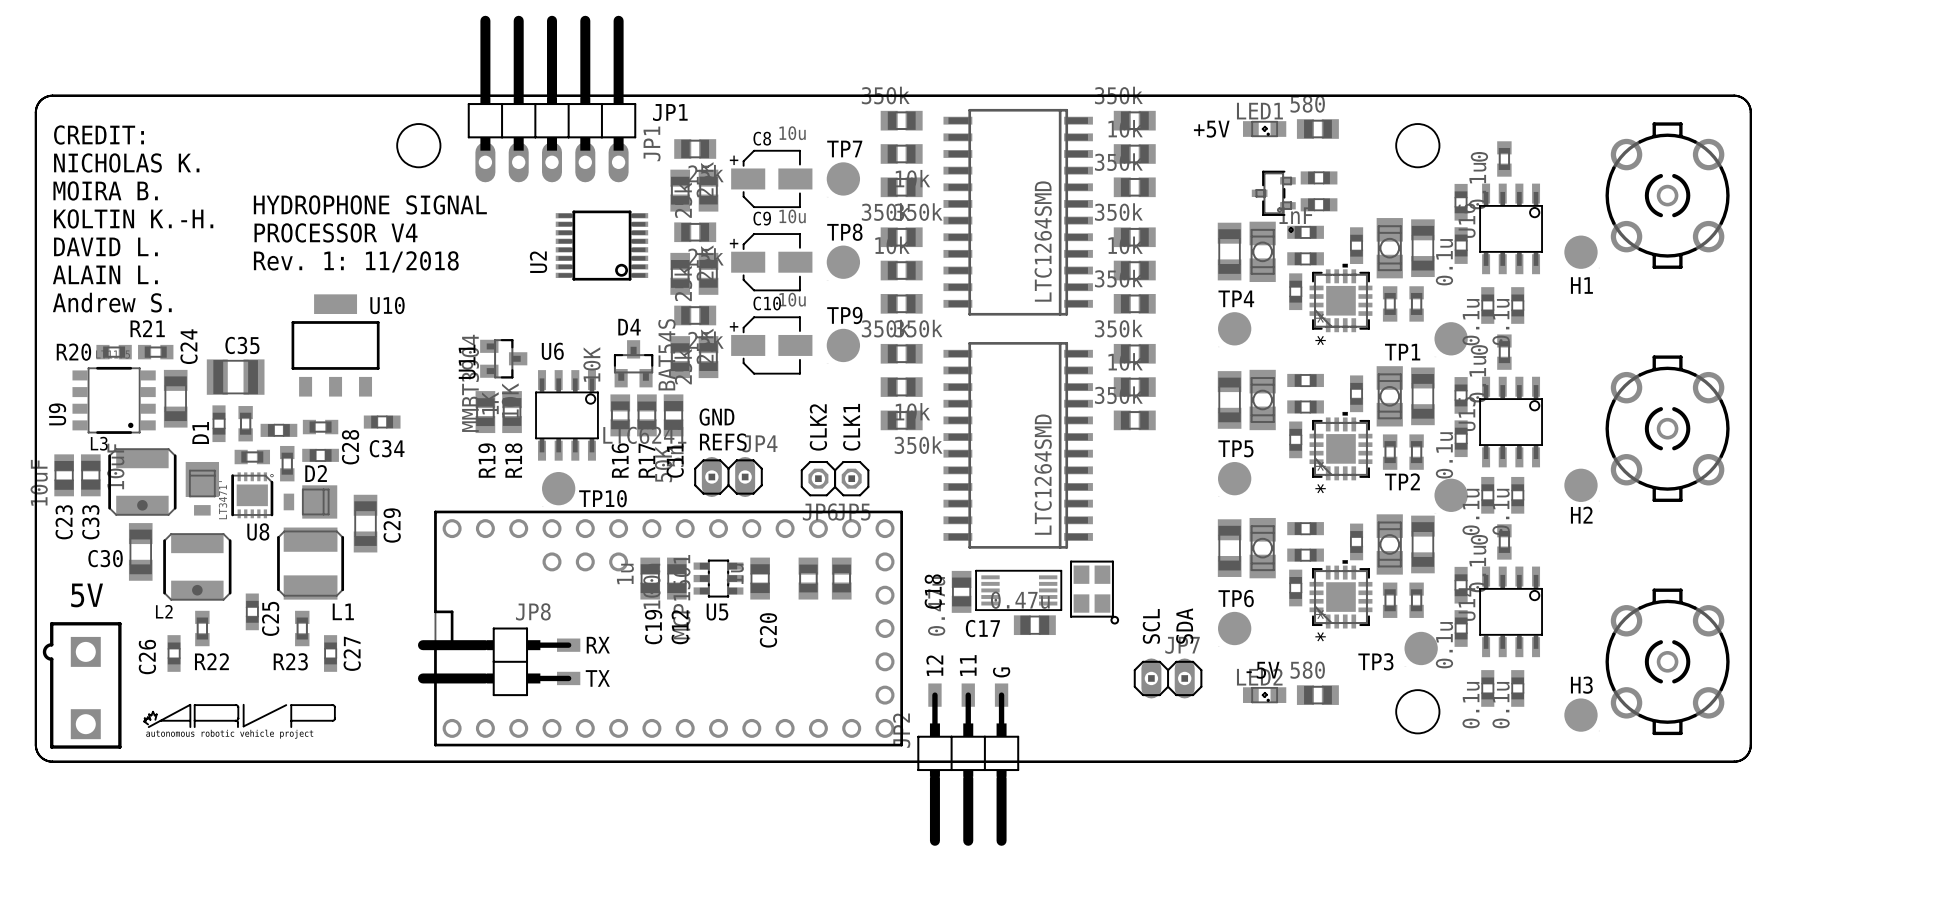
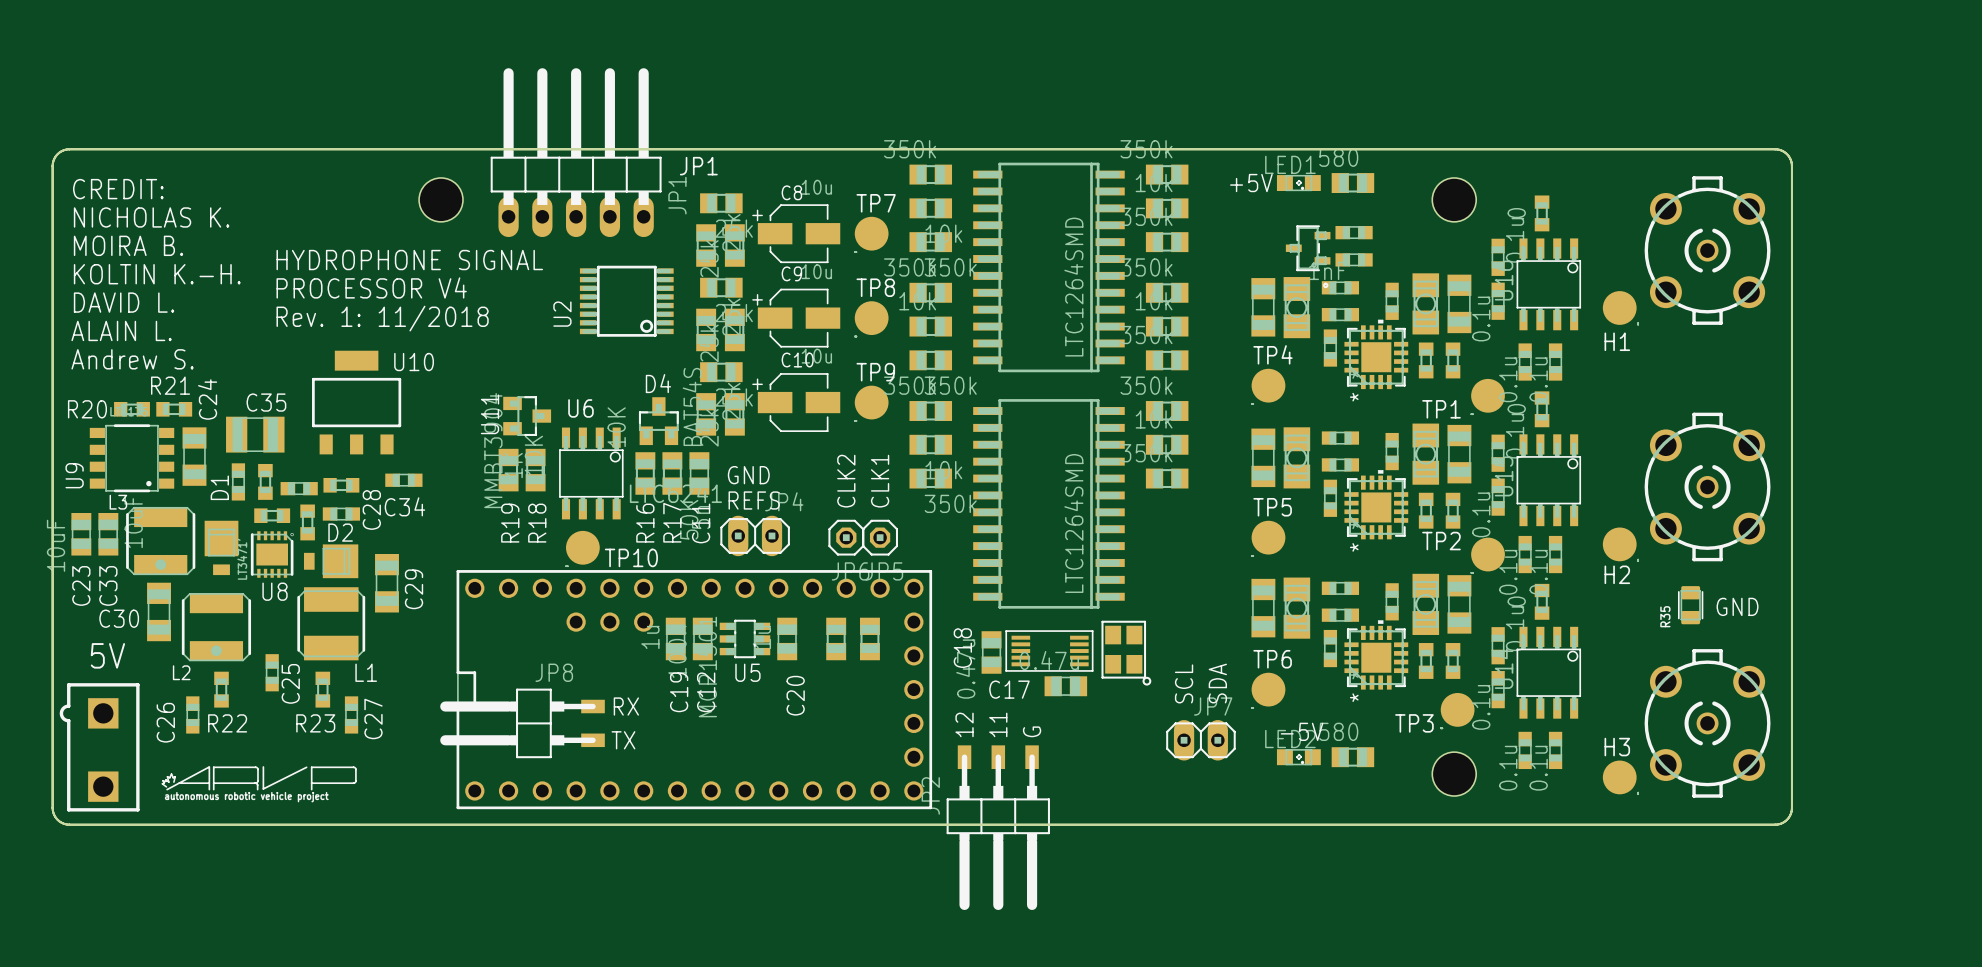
R35: none -> (1690, 605)
text: none -> GND (1737, 606)

